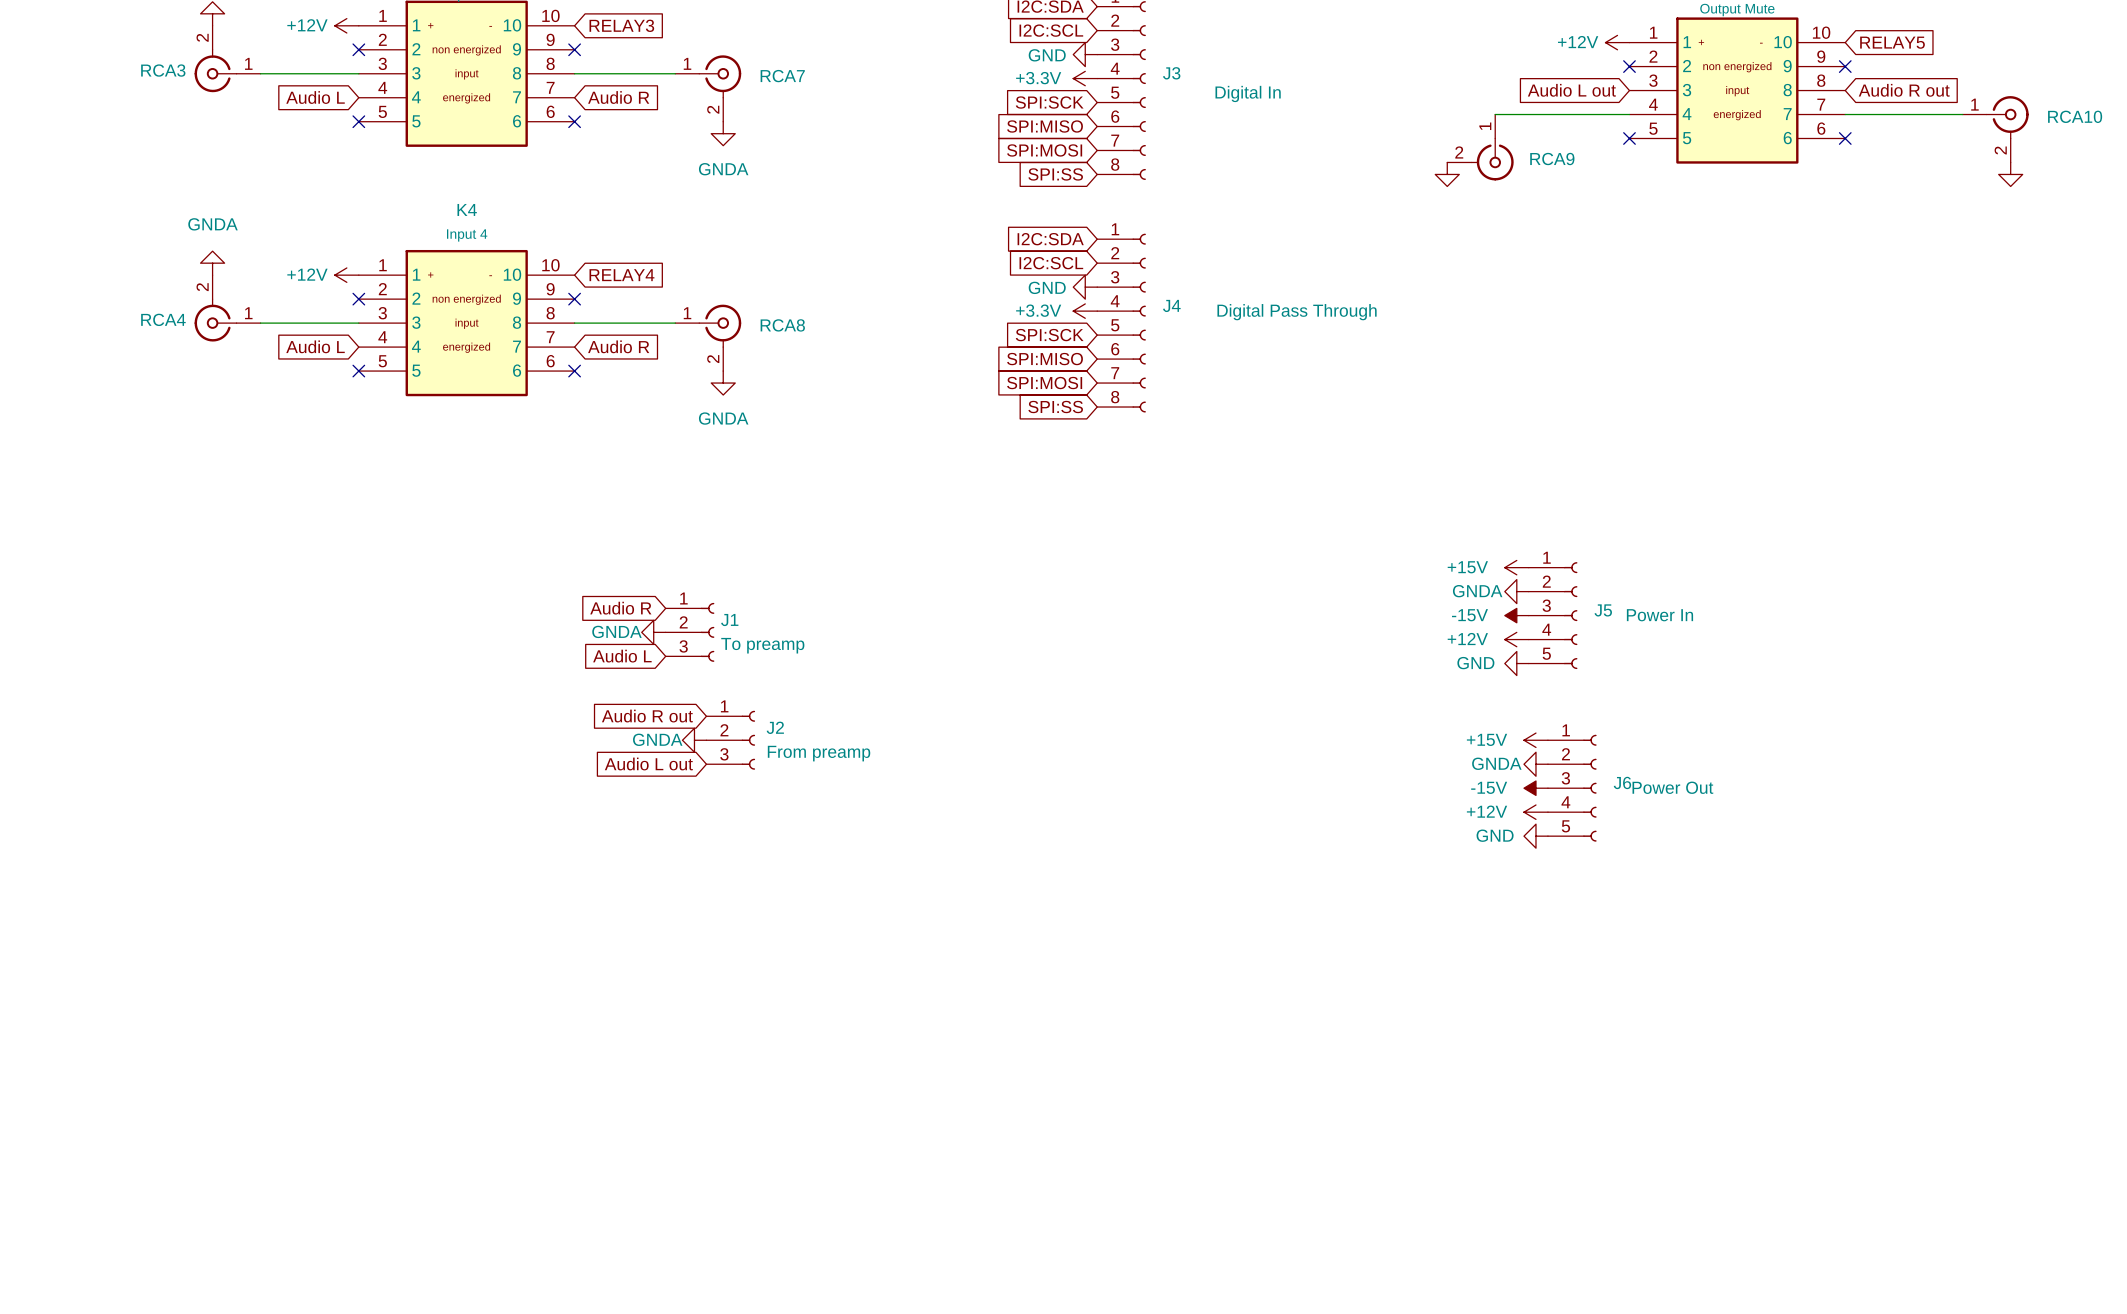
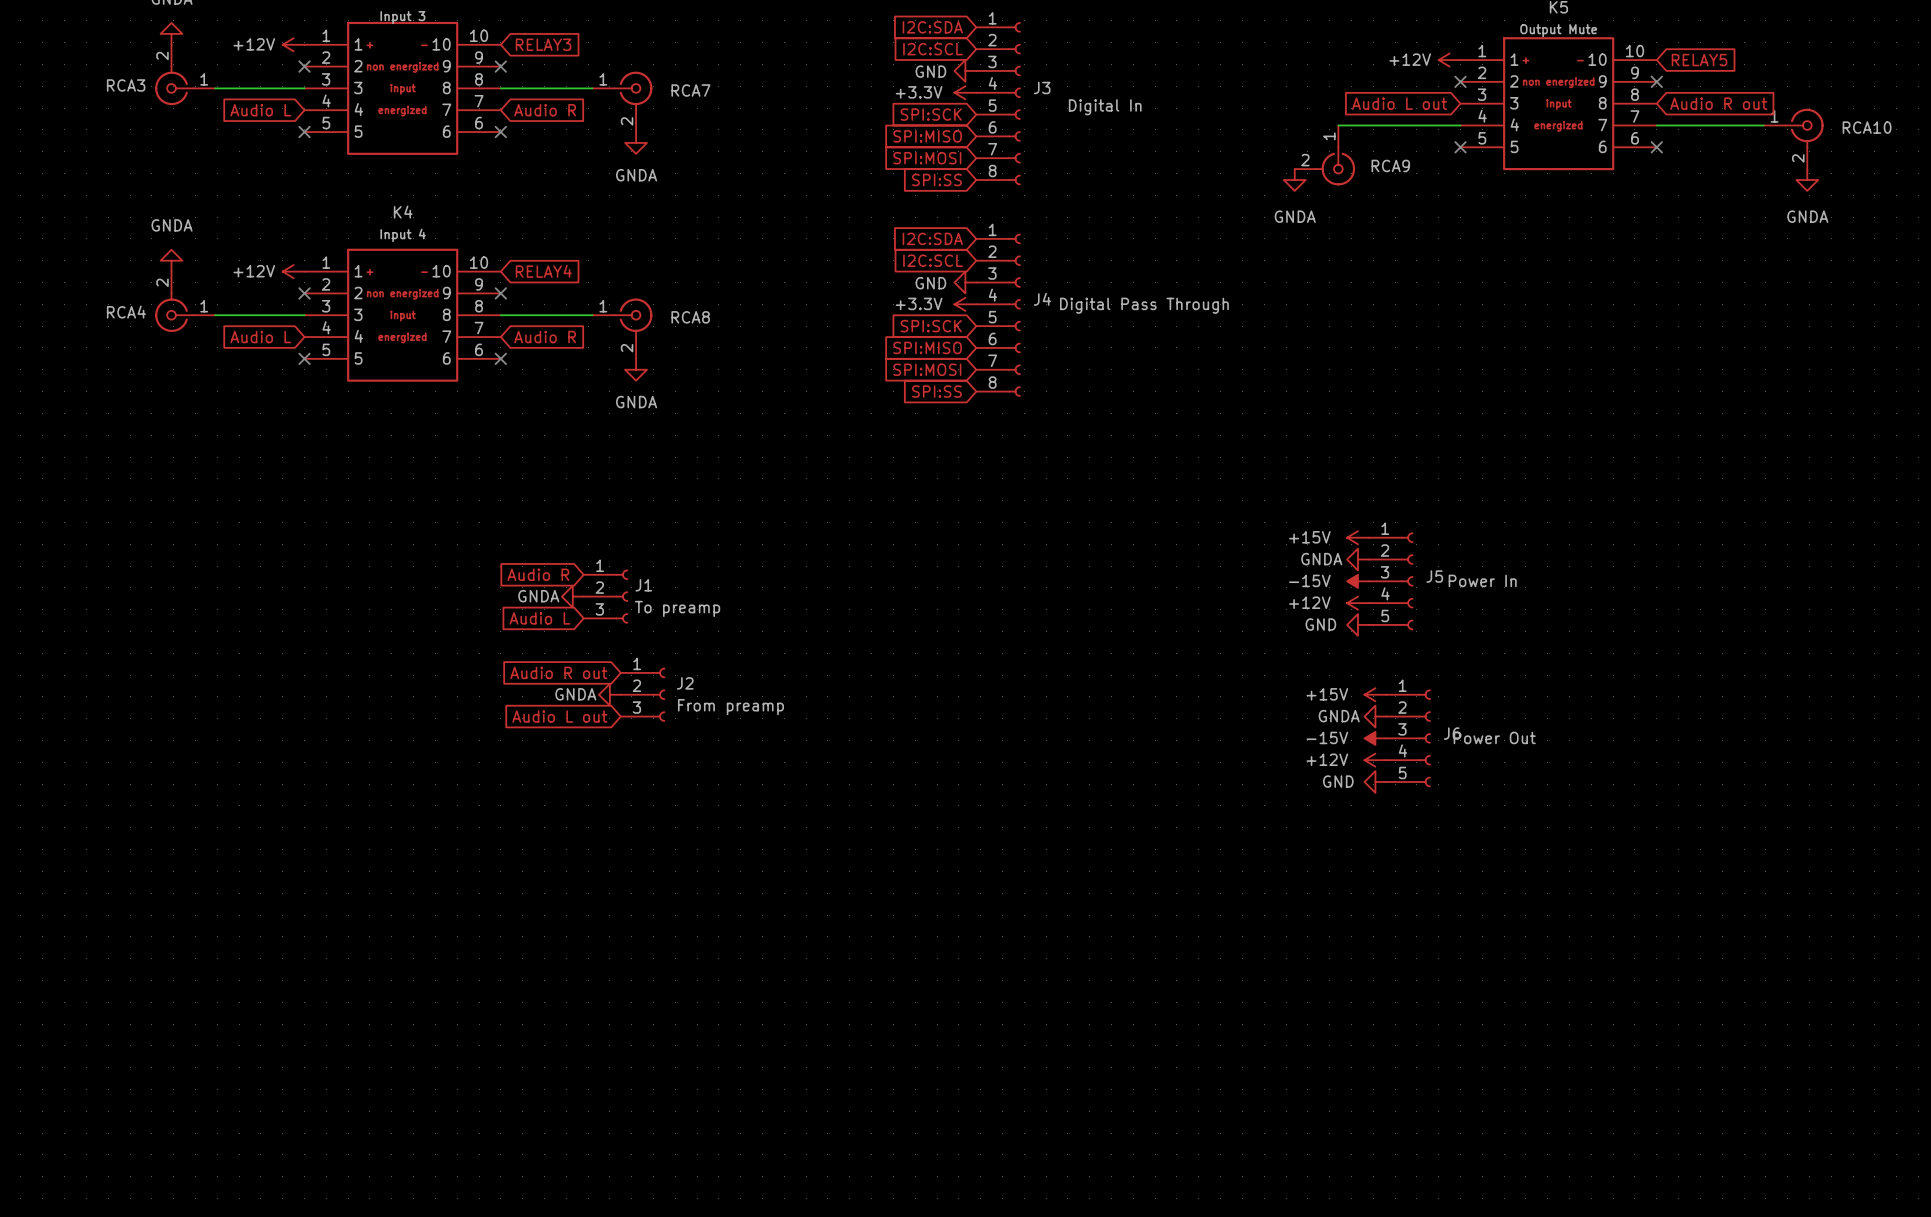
power symbol text: none -> GNDA (1295, 216)
power symbol text: none -> GNDA (1807, 216)

